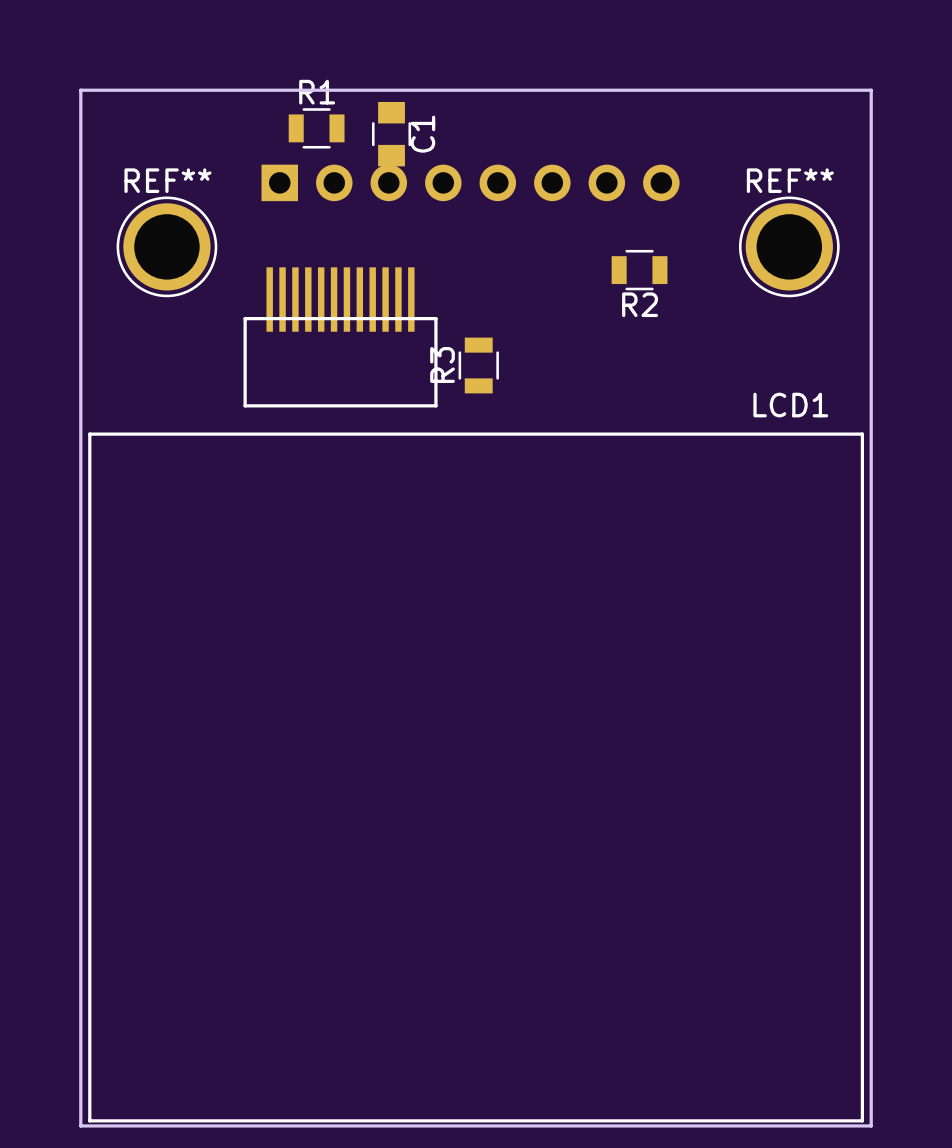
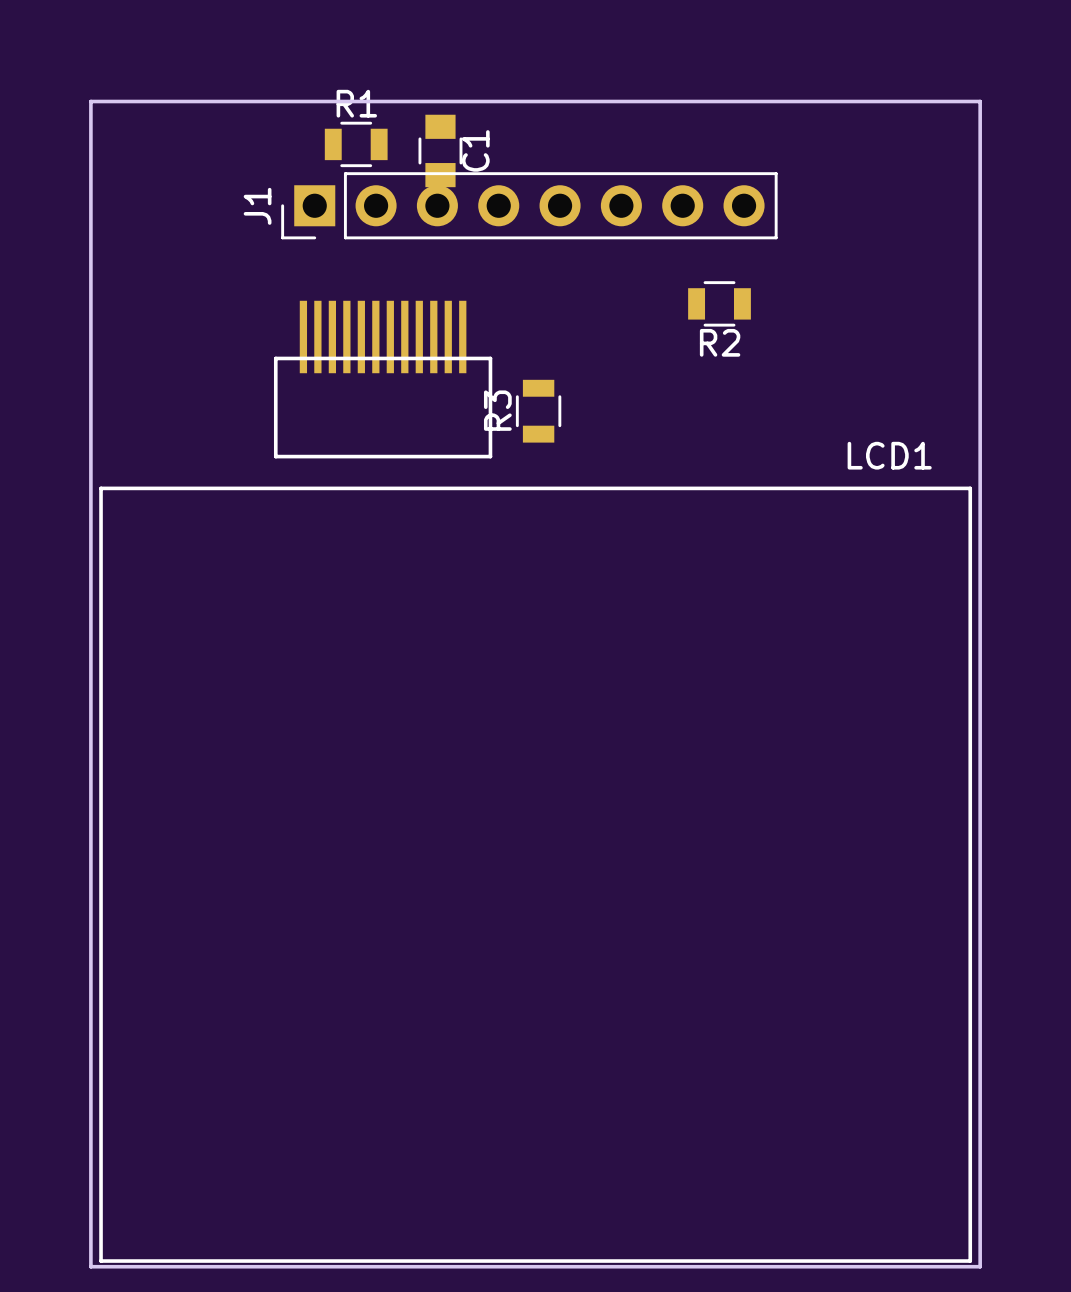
J1 side: bottom (470, 182) -> top (529, 205)
REF**: (166, 246) -> none
REF**: (789, 246) -> none

